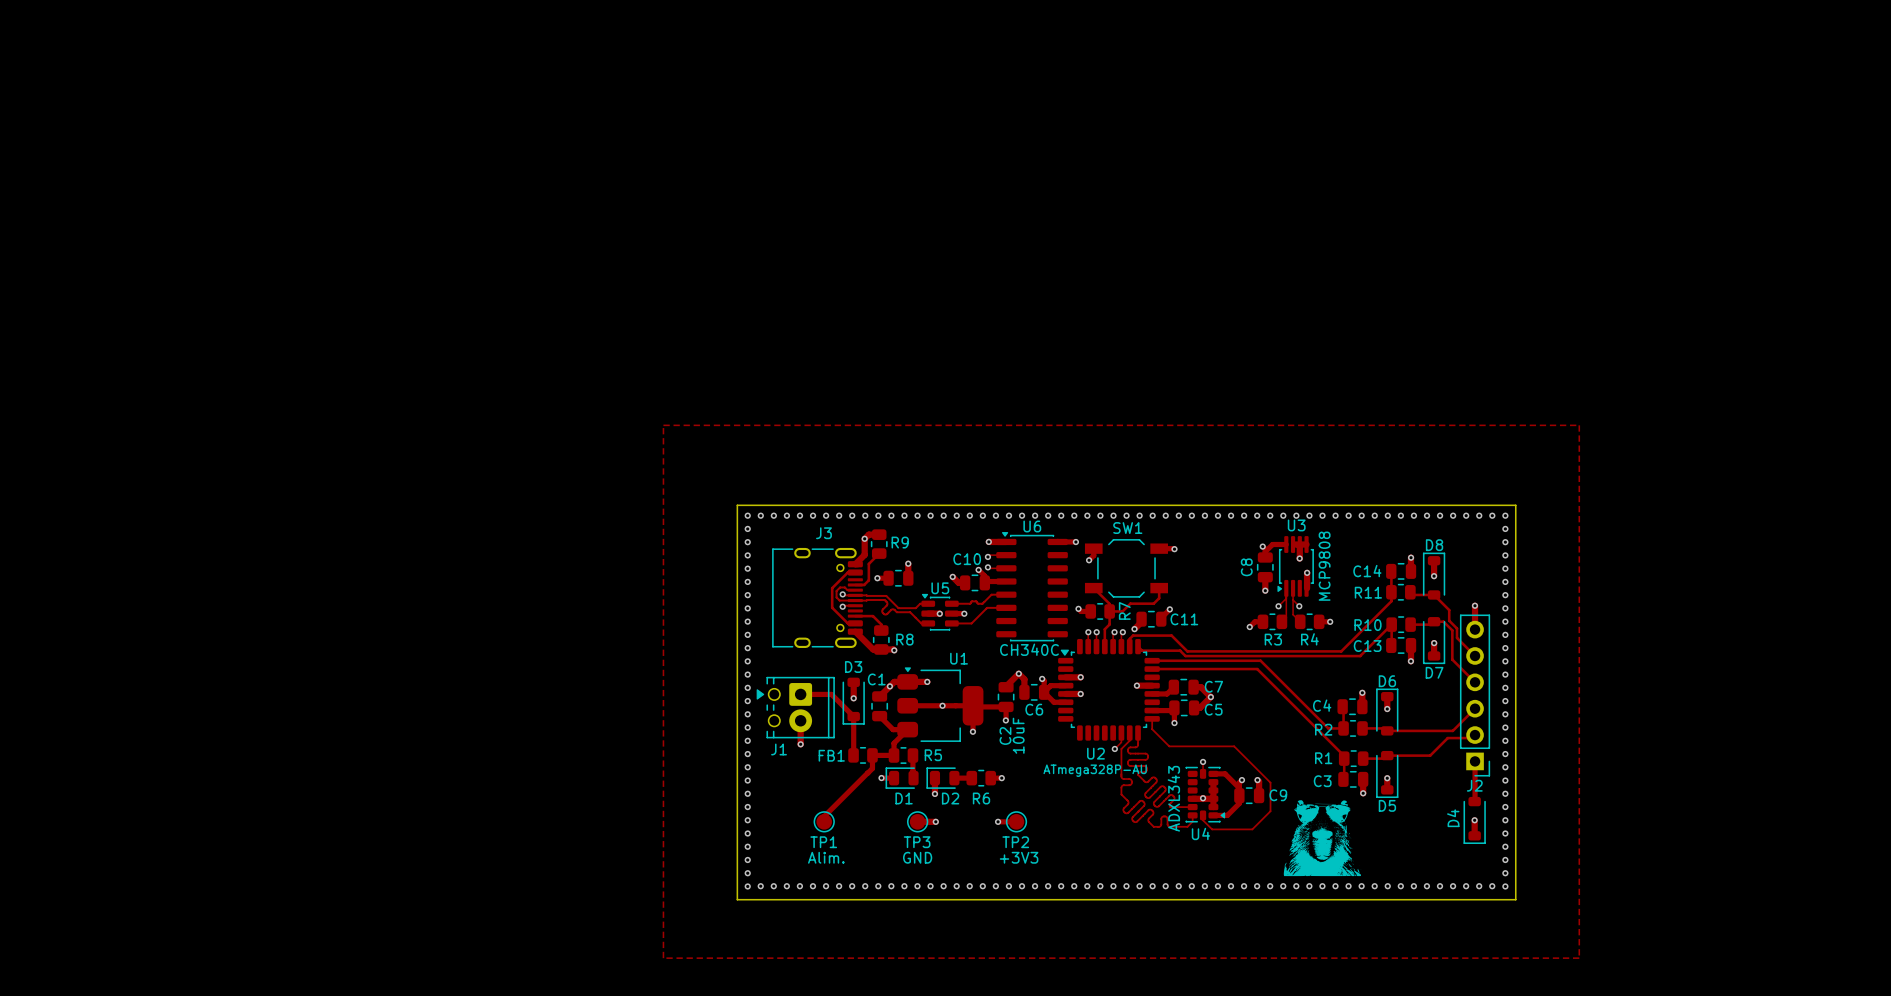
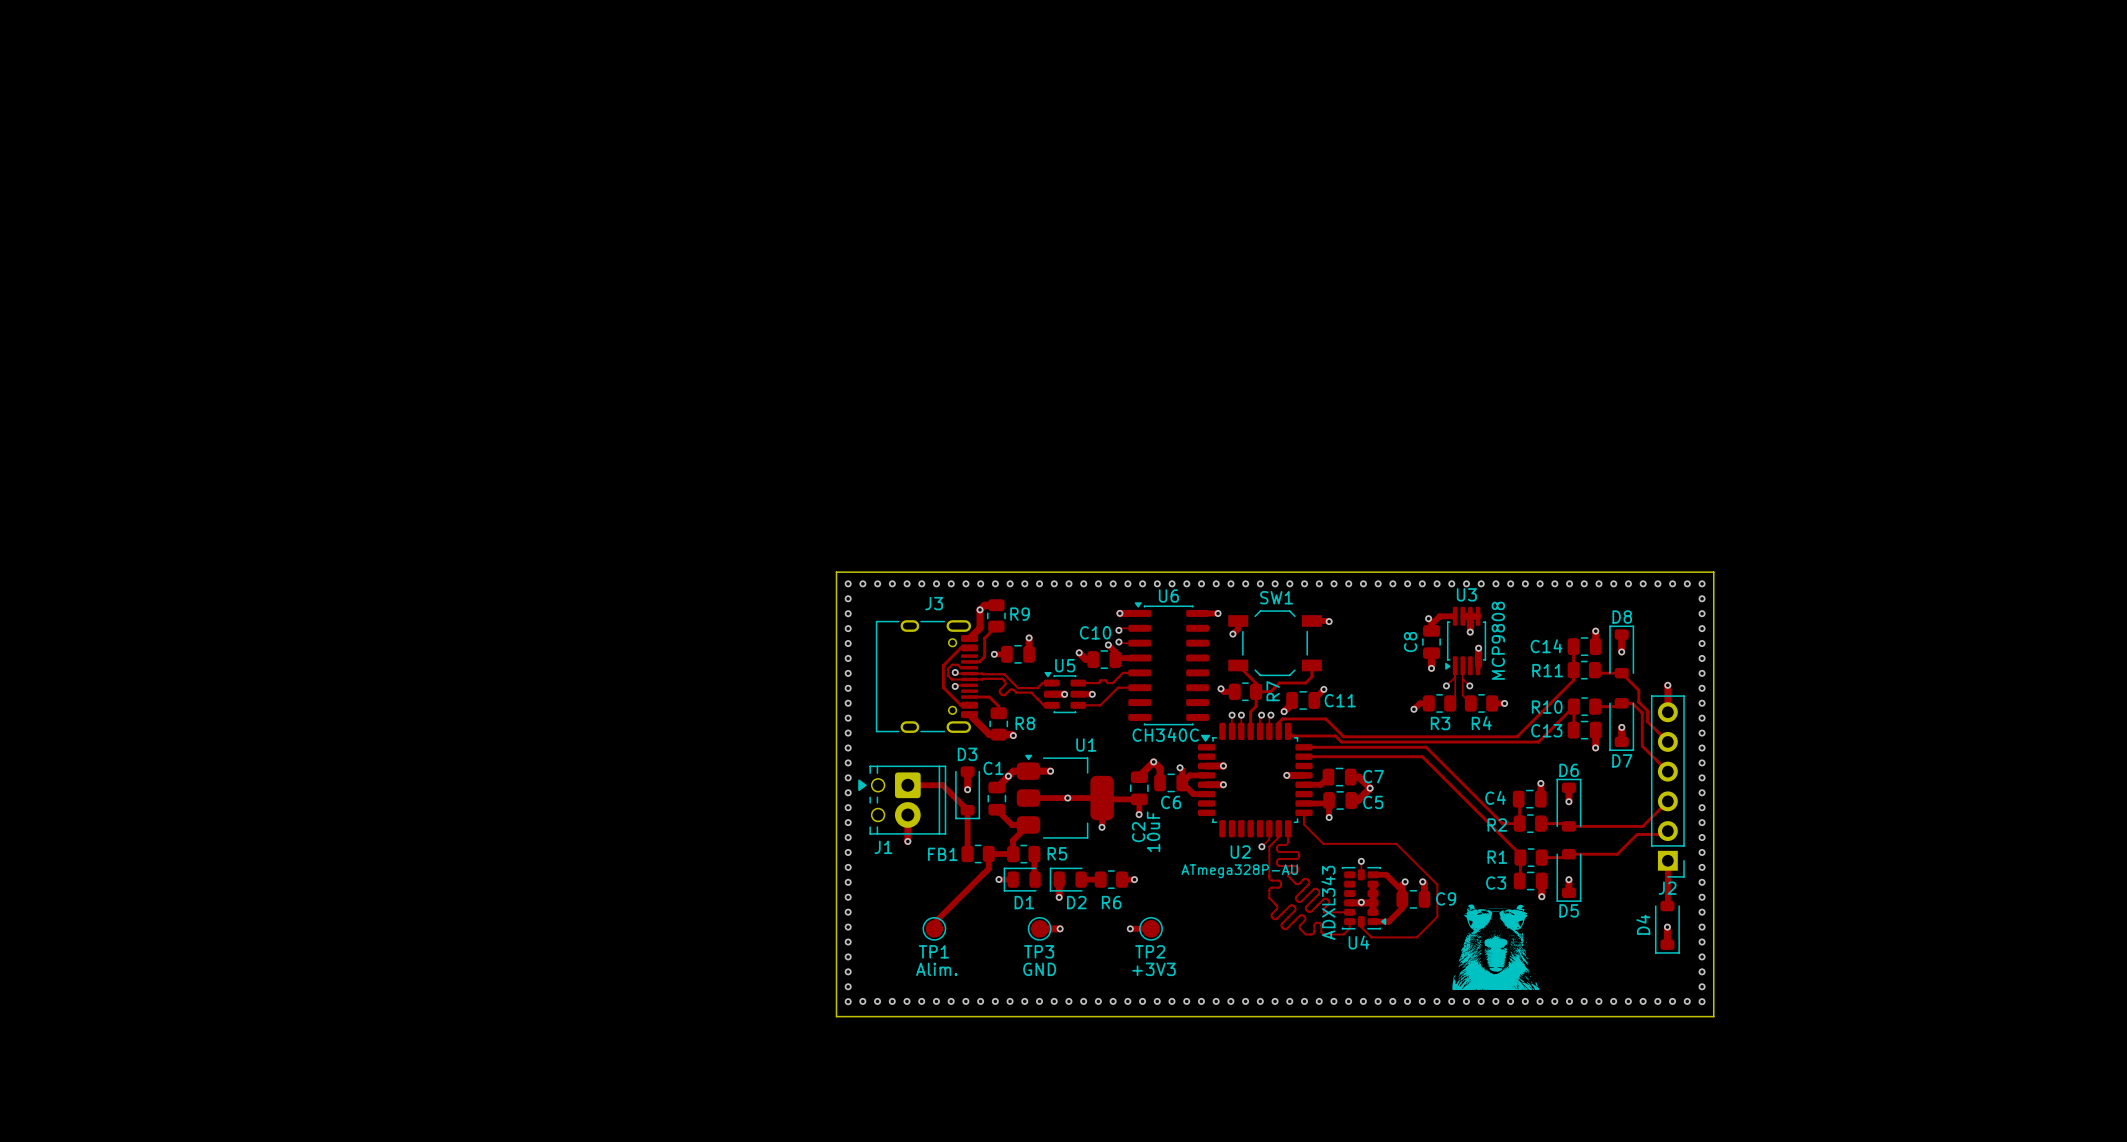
zone outline: (663, 425) (1579, 425) (1579, 958) (663, 958) (663, 425) -> none

